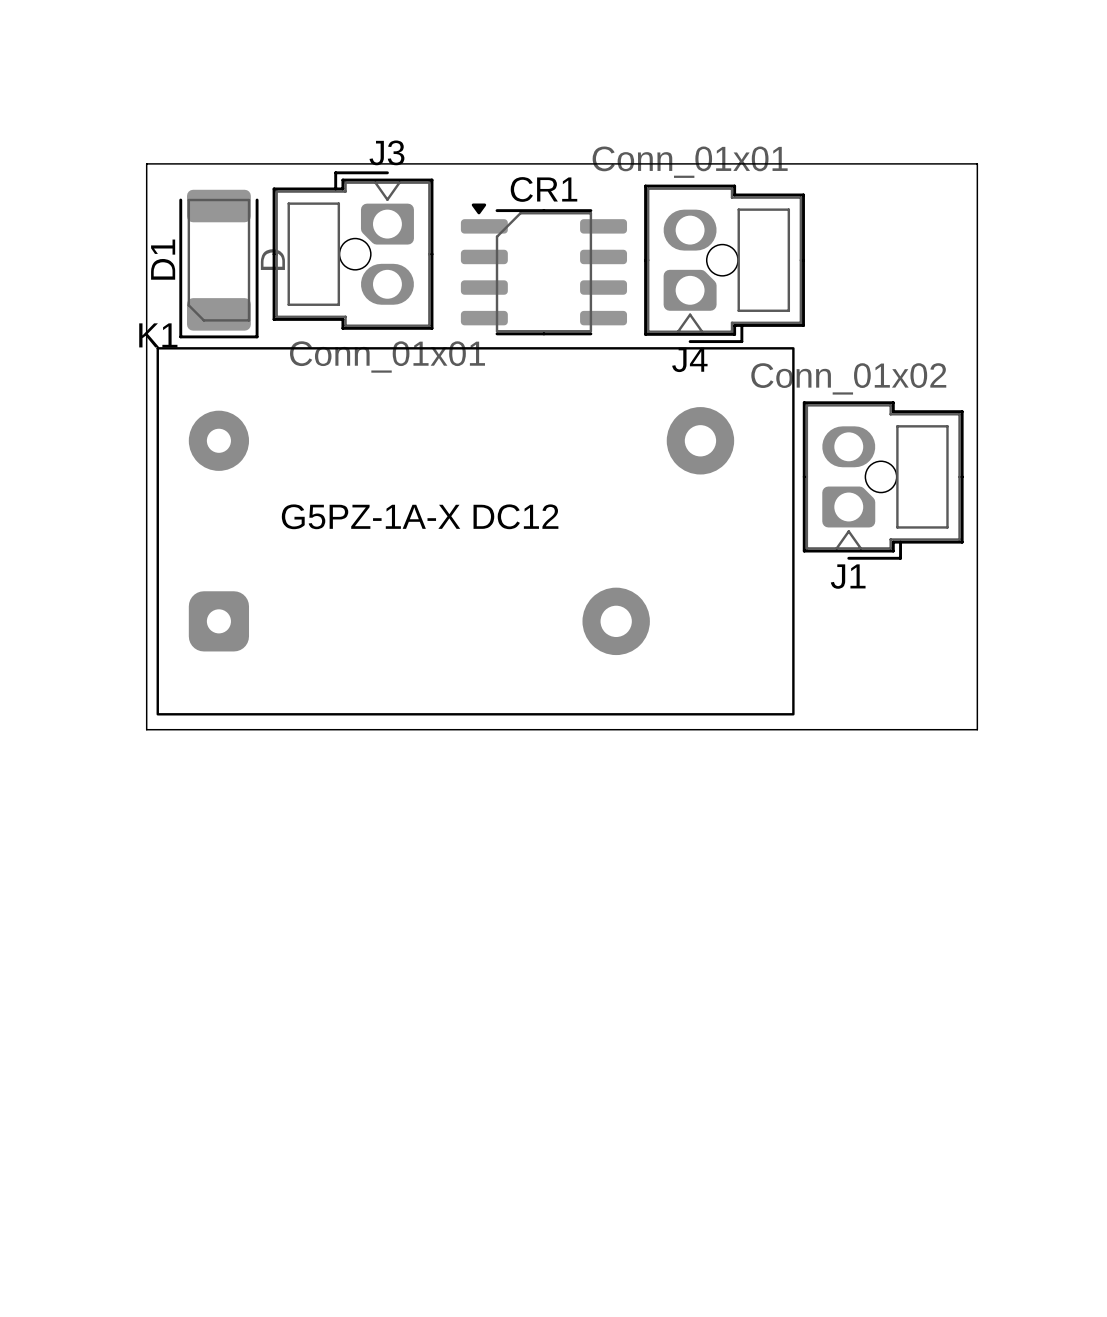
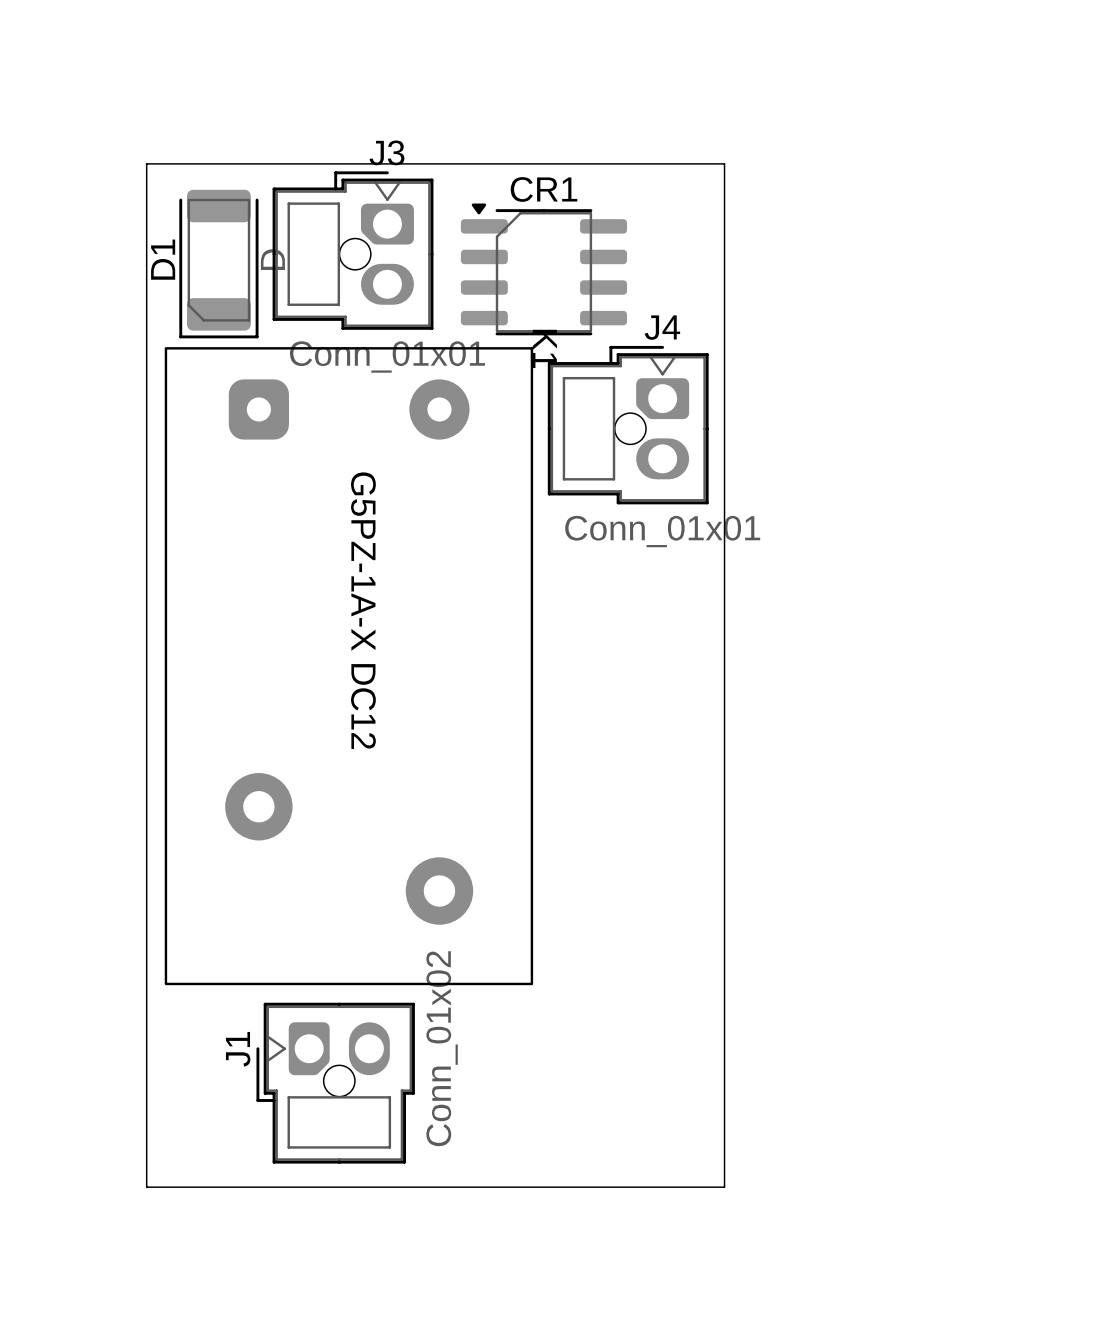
board edge: (724, 163) (977, 163) (977, 729) (146, 729) -> (724, 163) (724, 1187) (146, 1187) (146, 729)
J4 rotation: 0° (724, 263) -> 180° (628, 425)
J4 position: (724, 263) -> (628, 425)
J1 rotation: 0° (883, 480) -> 90° clockwise (335, 1083)
J1 position: (883, 480) -> (335, 1083)
K1 rotation: 0° (475, 531) -> 90° clockwise (348, 666)

